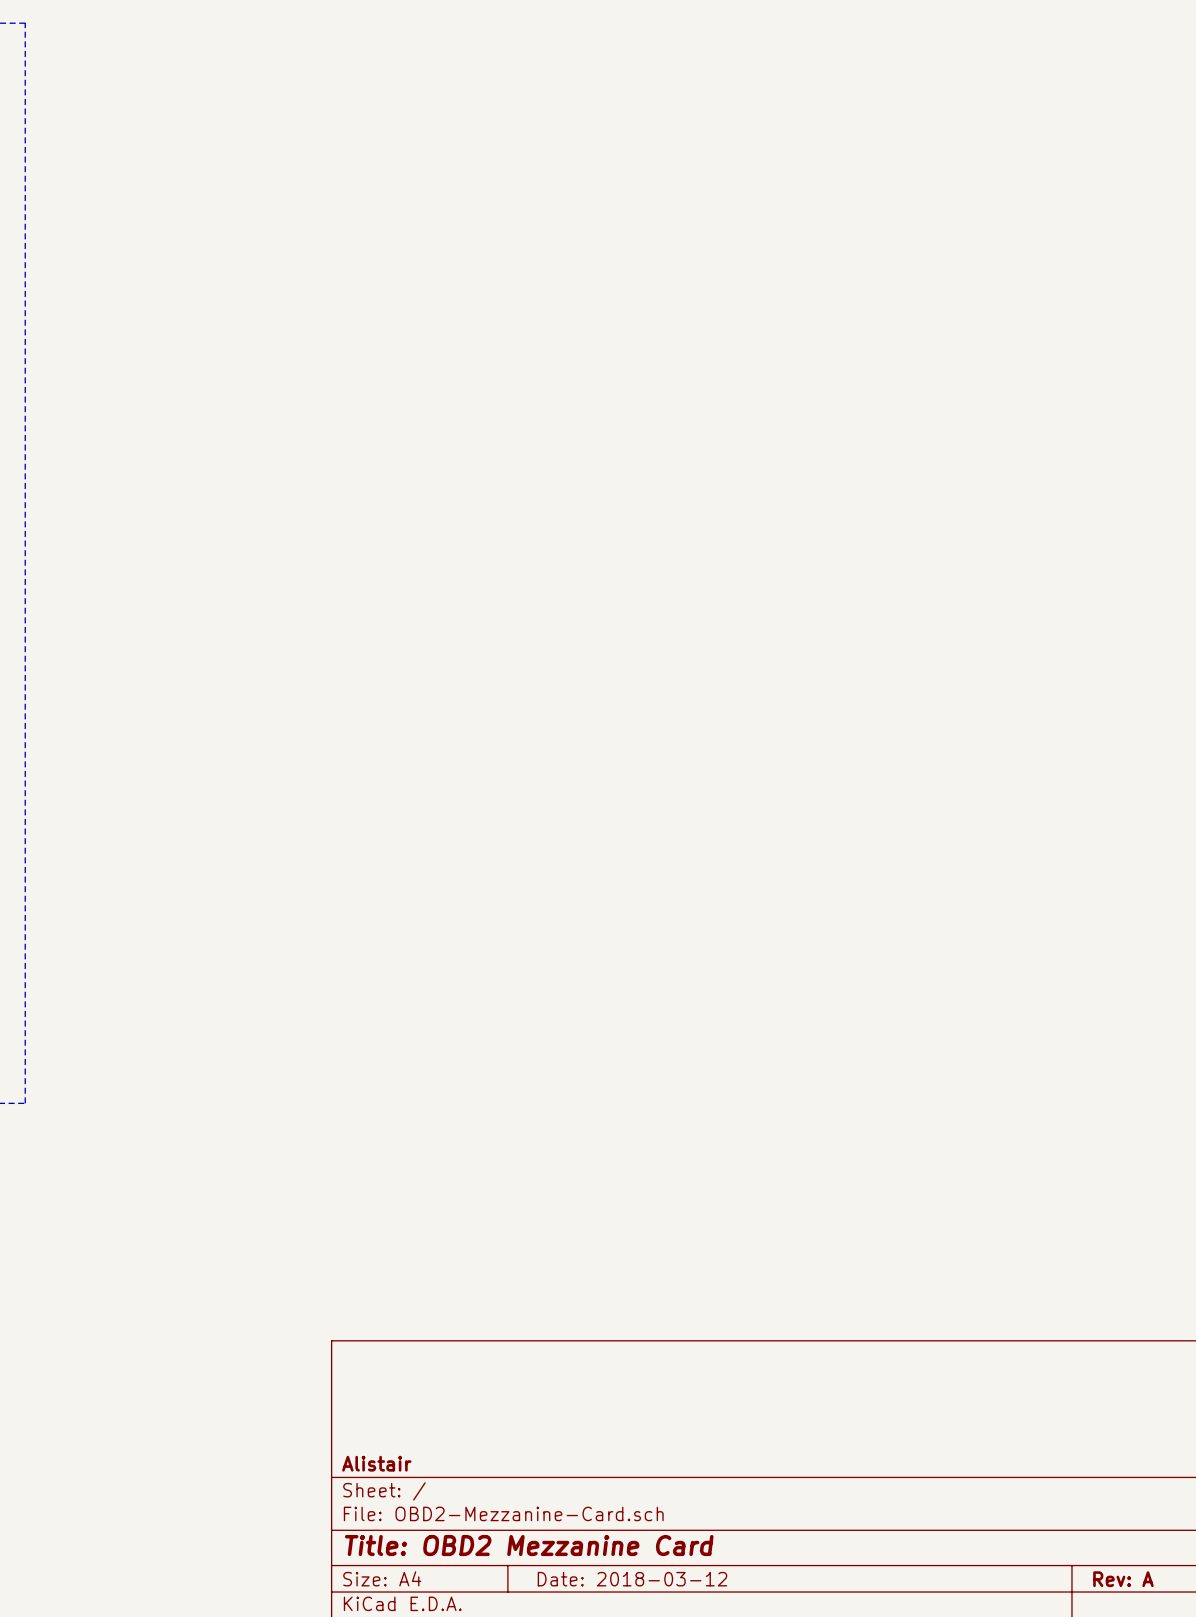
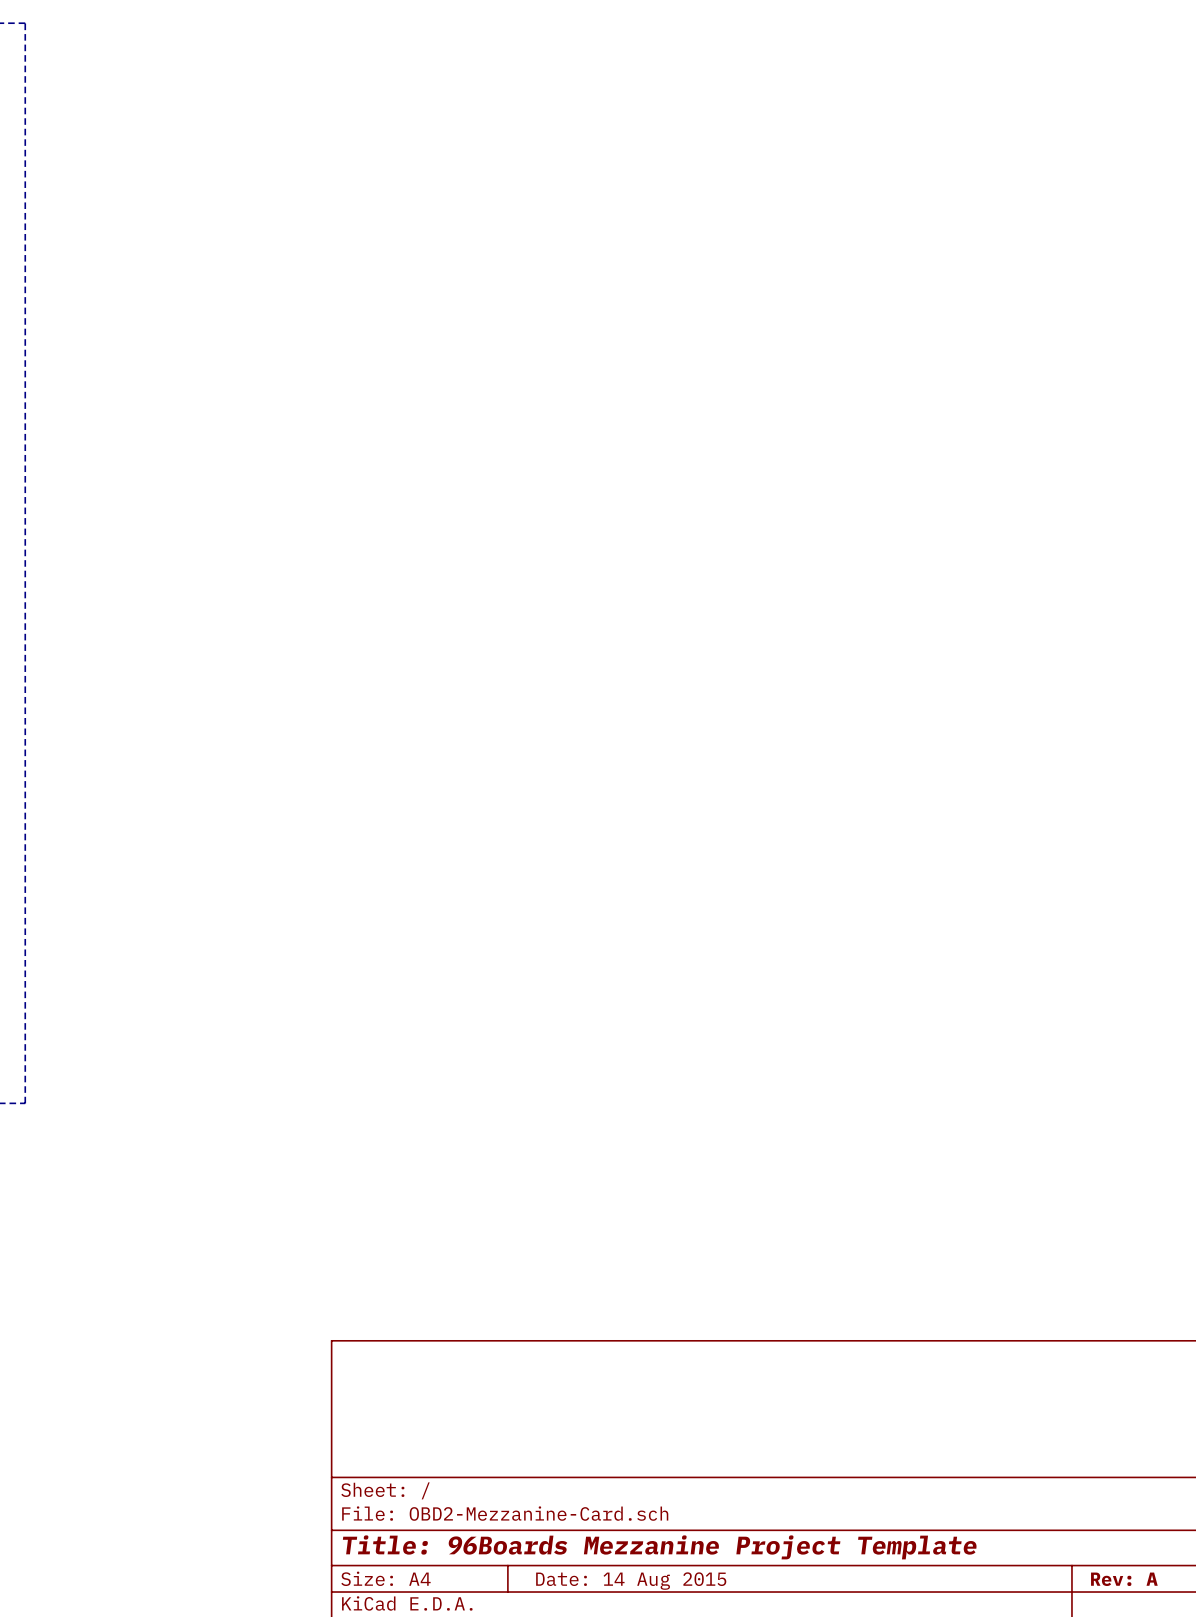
title block: Alistair (376, 1463) -> none
title block: Title: OBD2 Mezzanine Card (529, 1545) -> Title: 96Boards Mezzanine Project Template (659, 1547)
title block: Date: 2018-03-12 (632, 1579) -> Date: 14 Aug 2015 (631, 1581)

